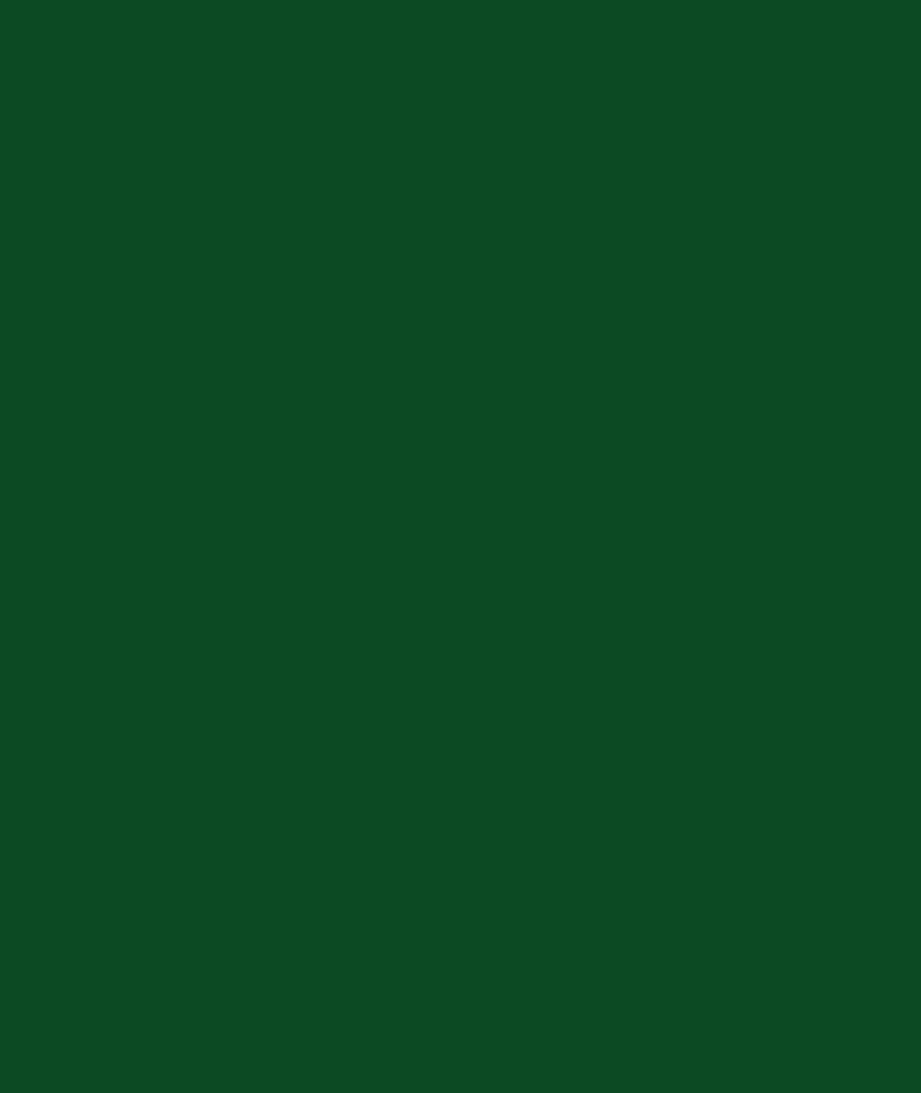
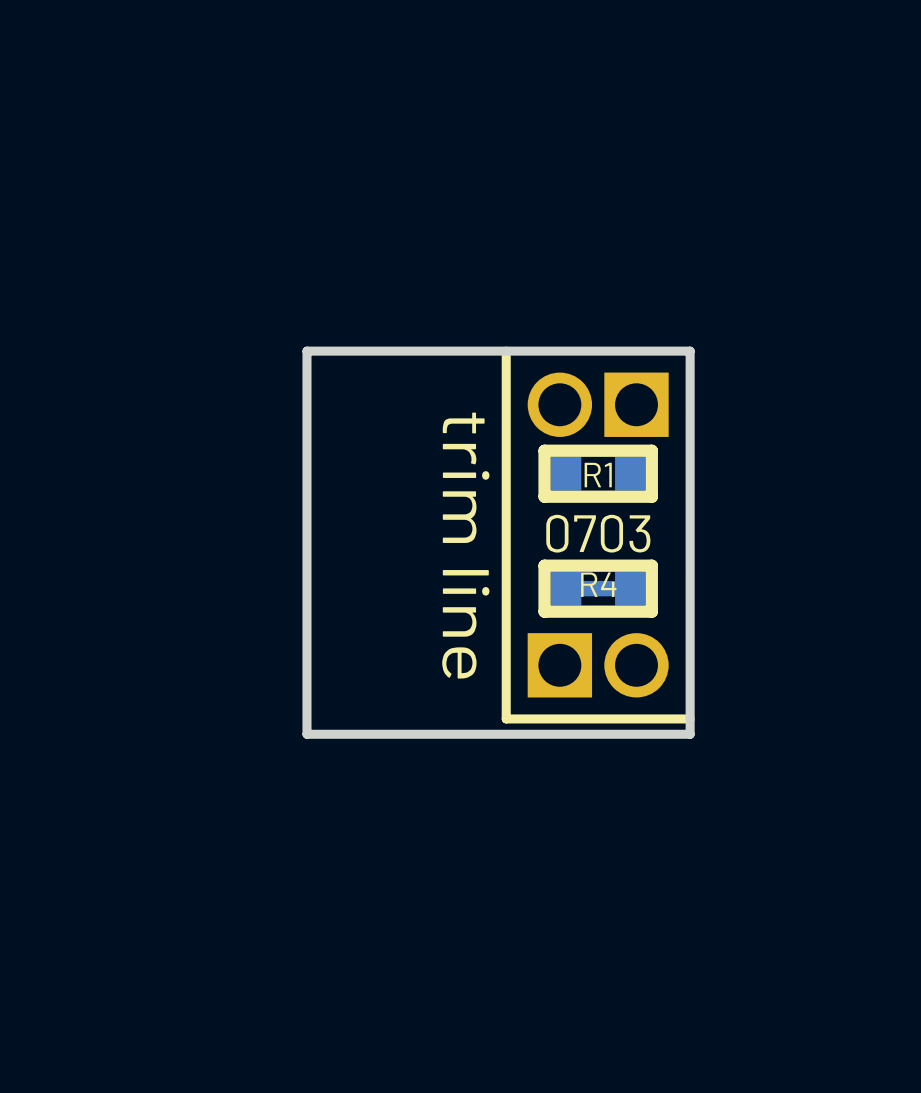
line: none -> (506, 351) (506, 718) (690, 718)
board edge: none -> (690, 351) (690, 734) (306, 734) (306, 351) (690, 351)
part: none -> (598, 404)
R1: none -> (598, 473)
text: none -> 0703 (598, 533)
text: none -> trim line (465, 545)
R4: none -> (598, 588)
part: none -> (598, 665)

